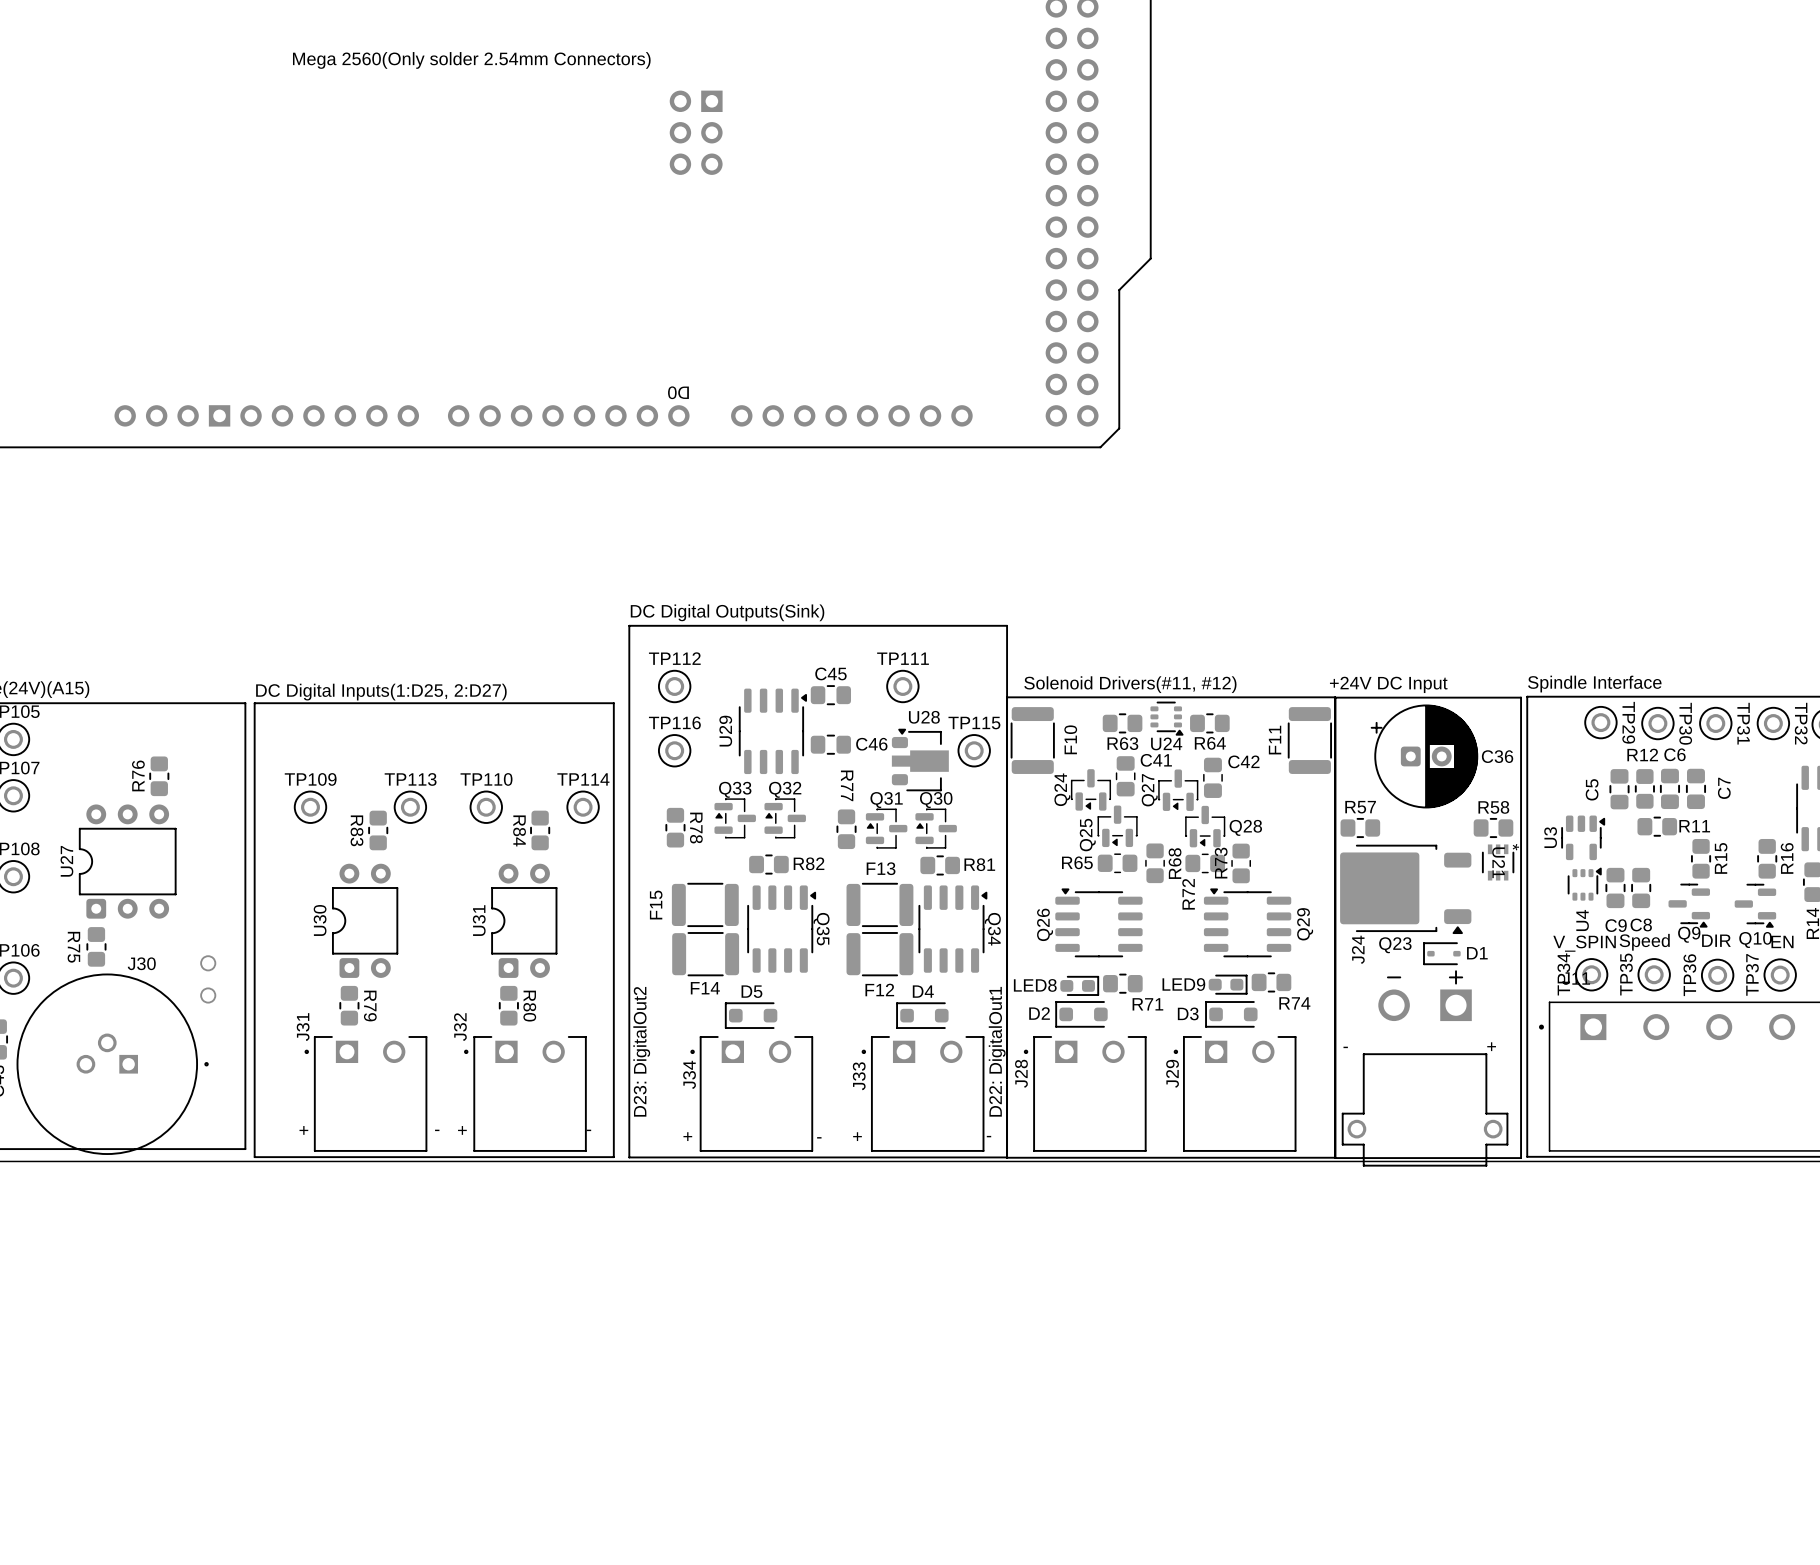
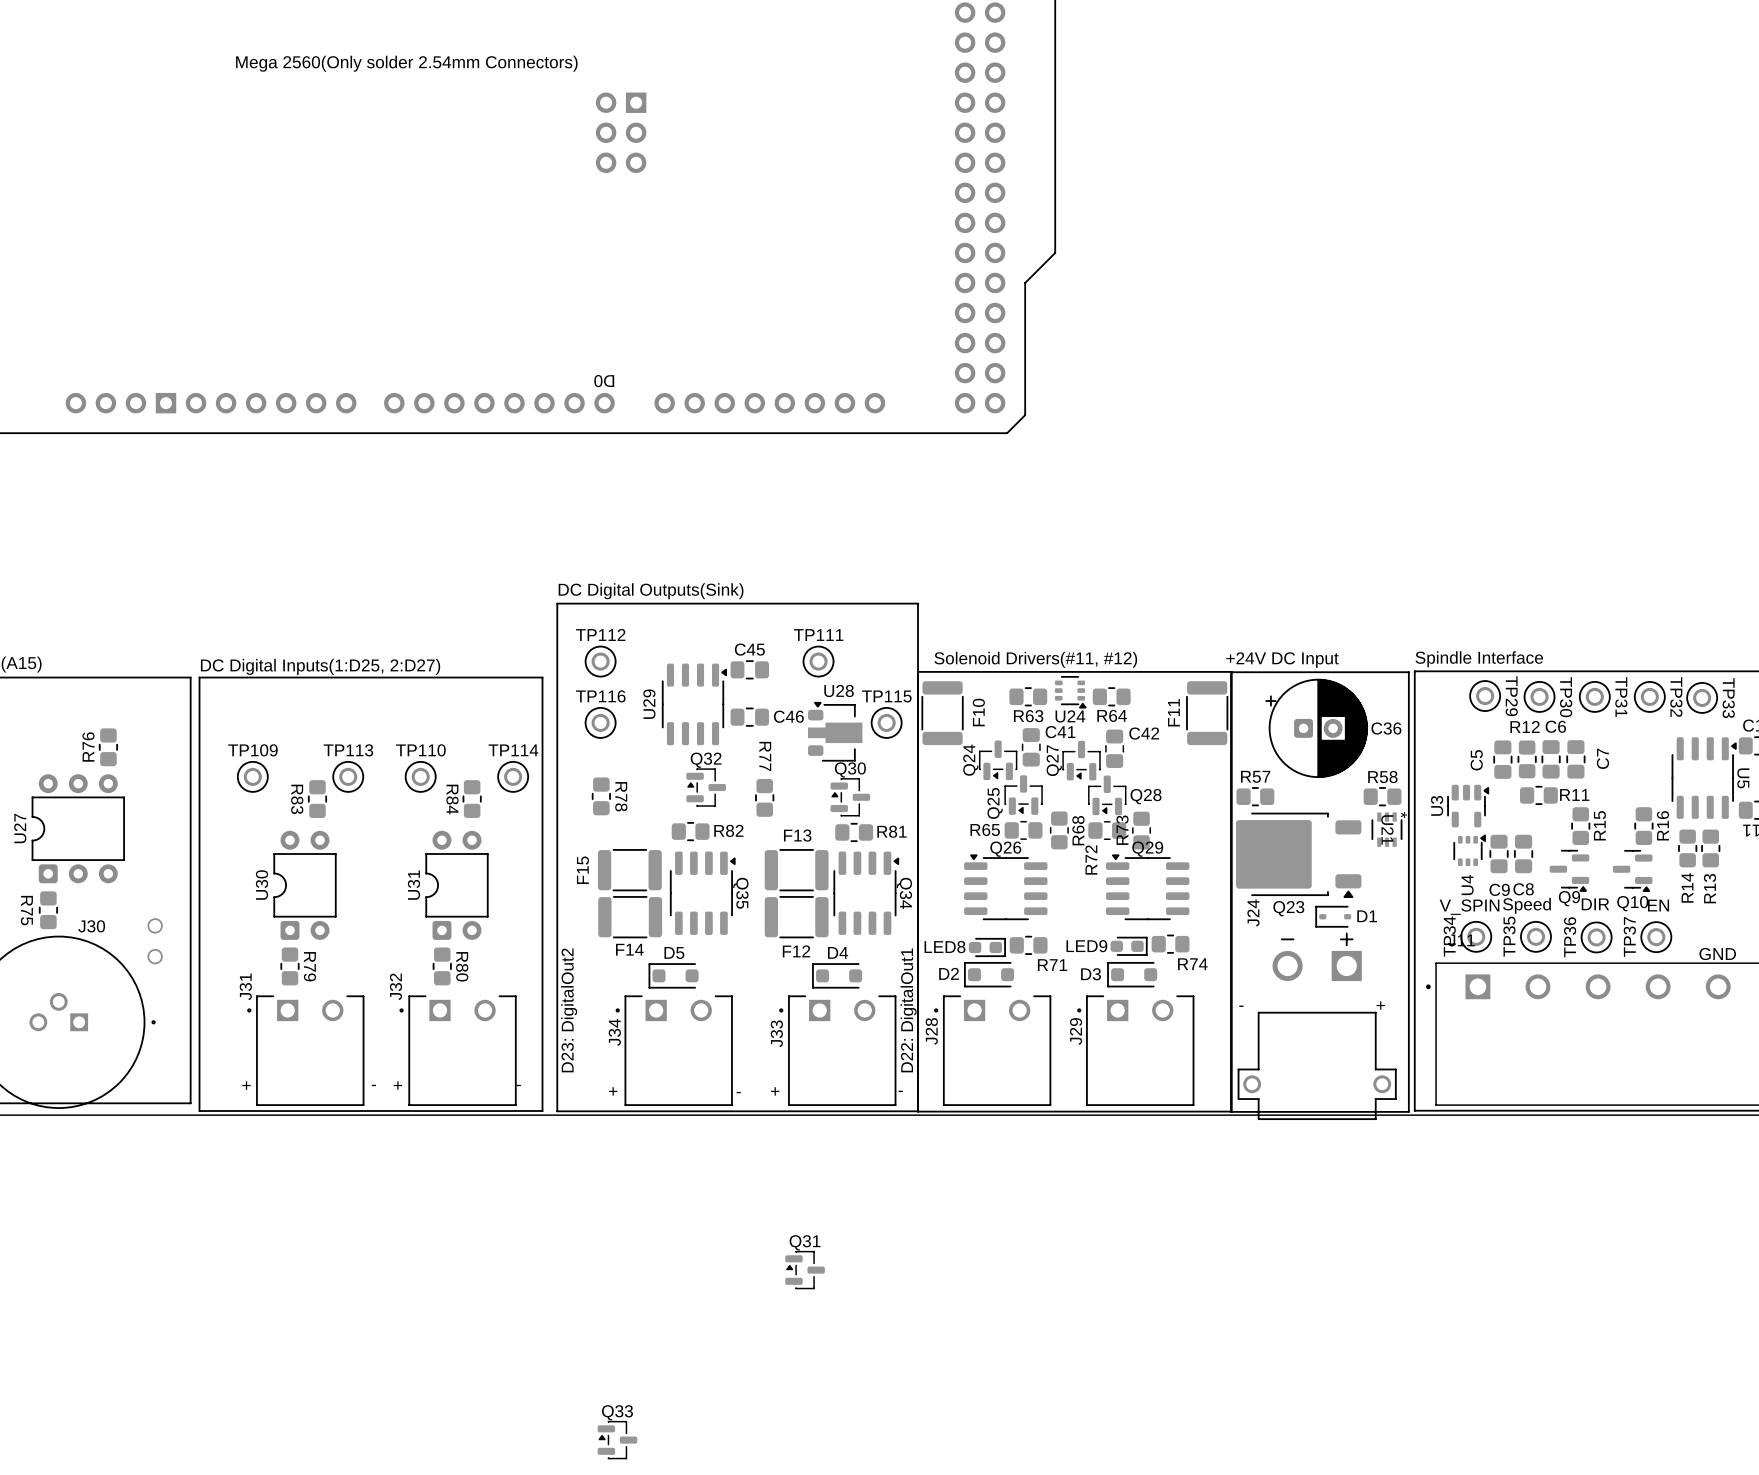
Q33 position: (735, 818) -> (617, 1440)
Q31 position: (886, 828) -> (805, 1270)
Q26 name rotation: 0° (1045, 924) -> 90° clockwise (1005, 849)
Q26 name position: Q26 (1045, 924) -> Q26 (1005, 849)
Q29 name rotation: 0° (1305, 924) -> 90° clockwise (1147, 849)
Q29 name position: Q29 (1305, 924) -> Q29 (1147, 849)

